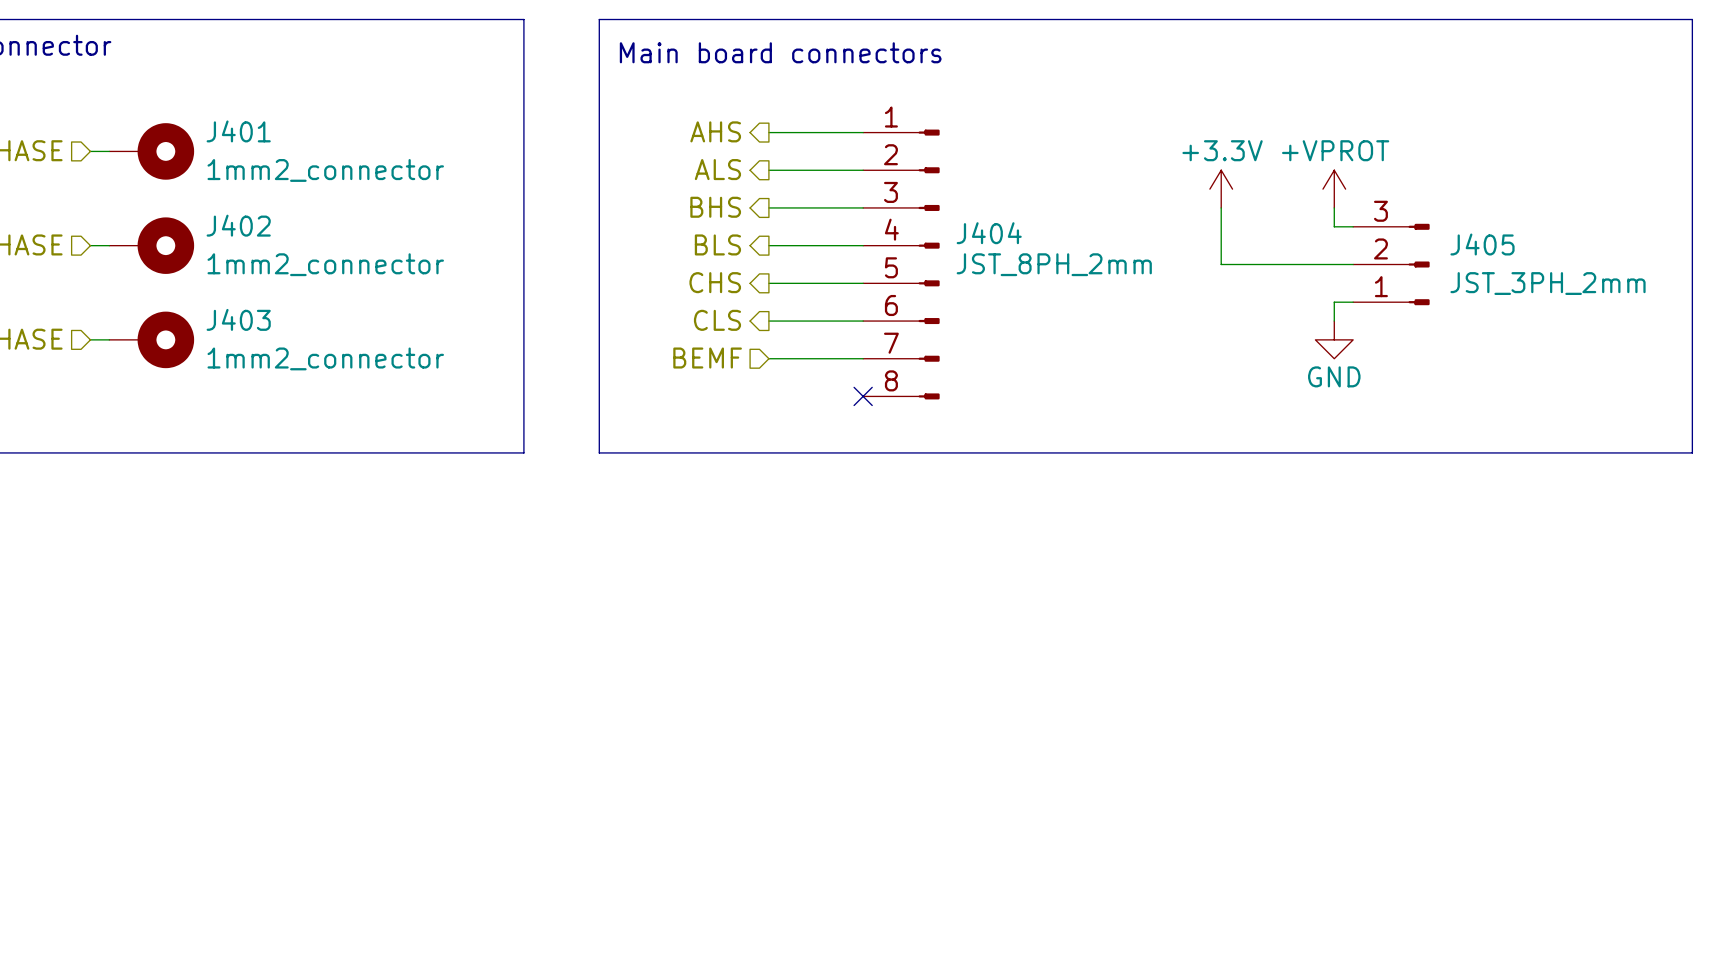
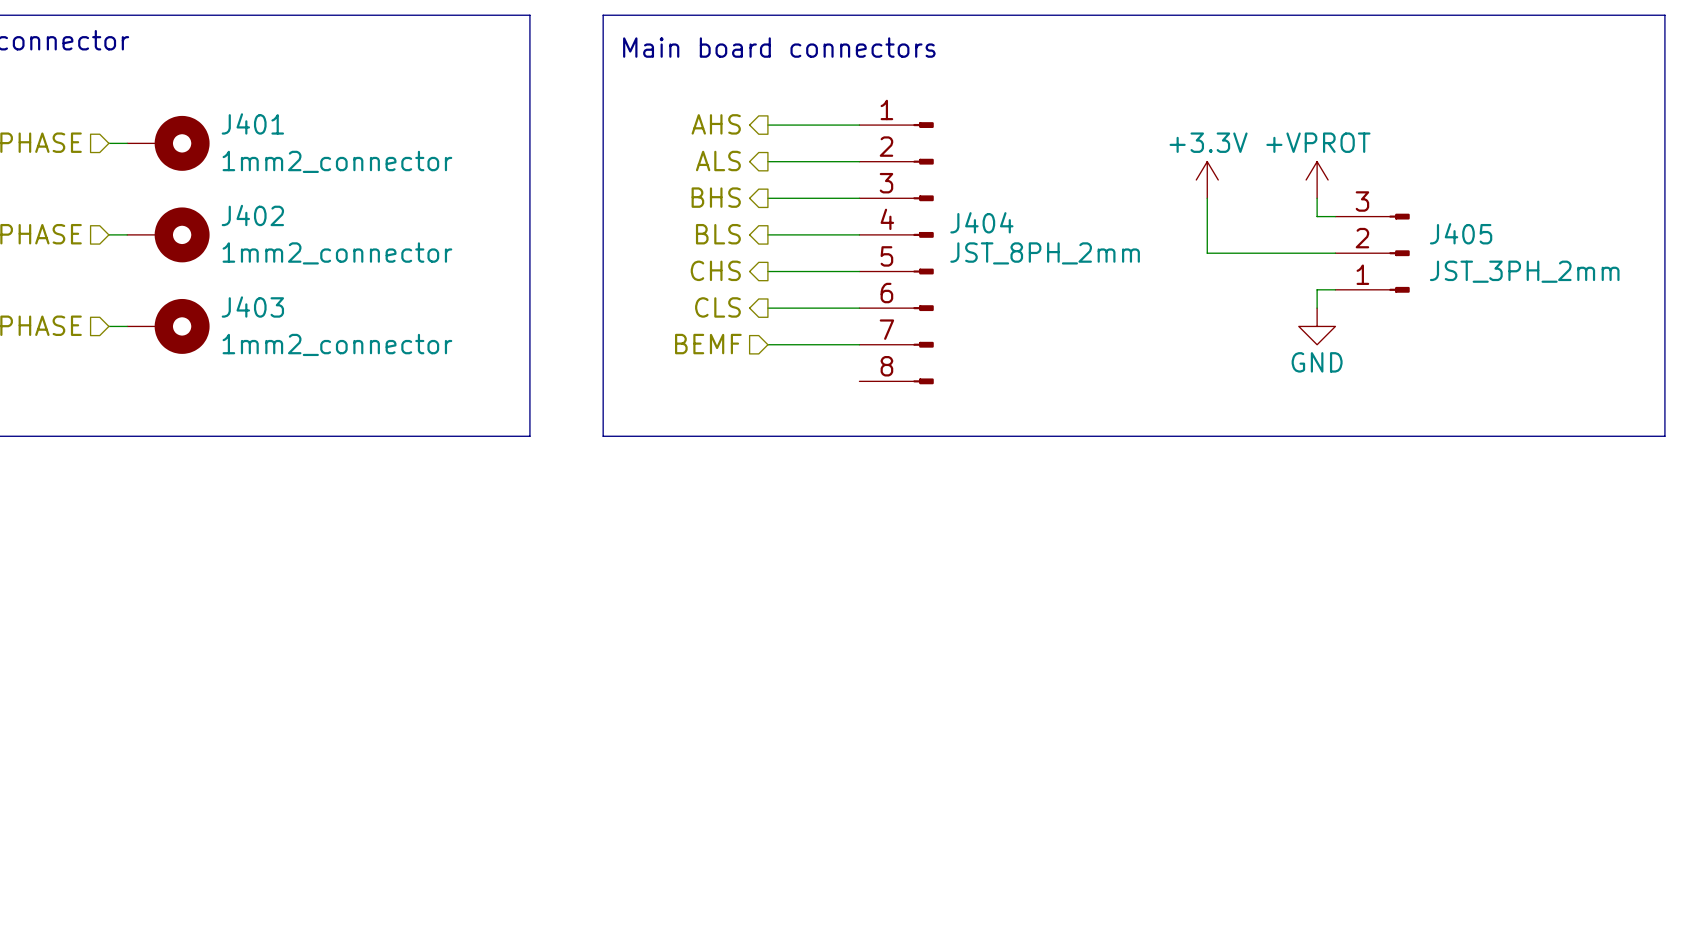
no-connect mark: (863, 396) -> none

